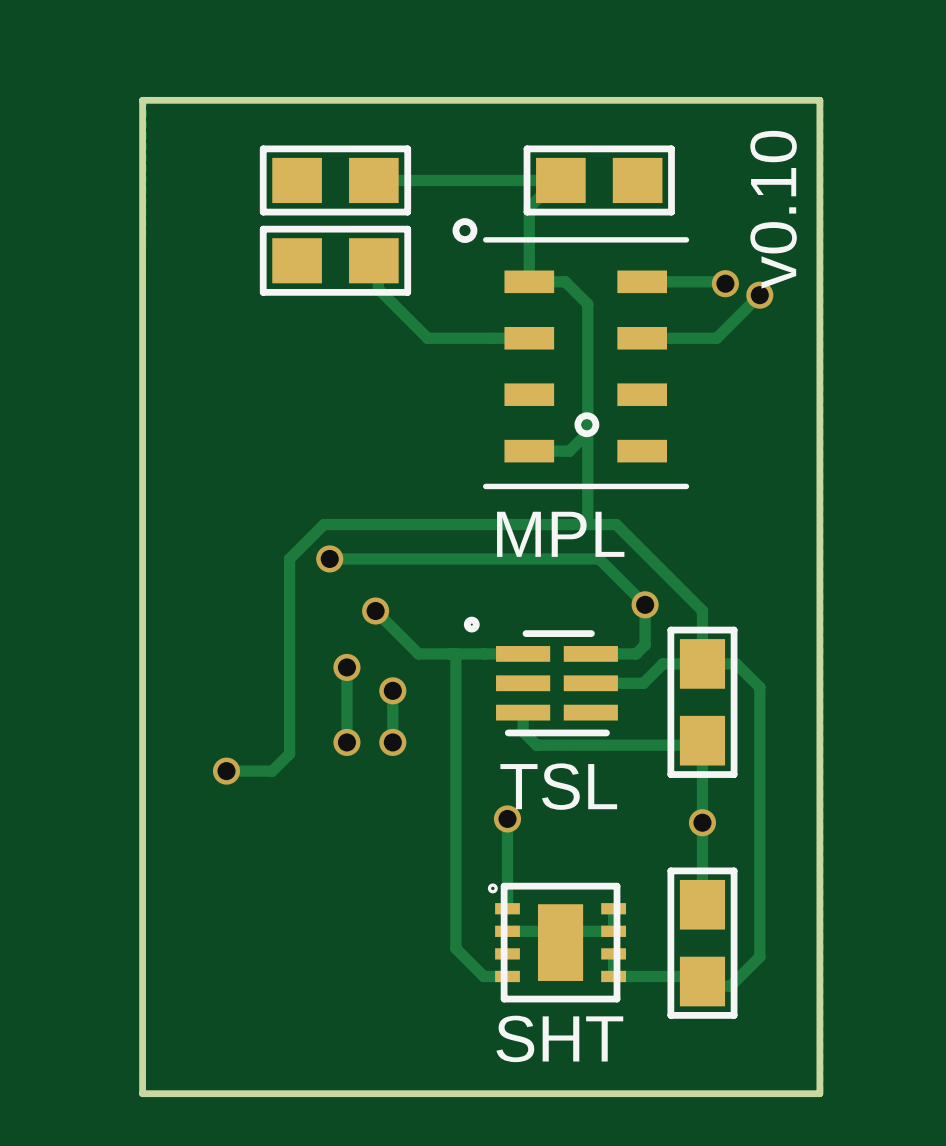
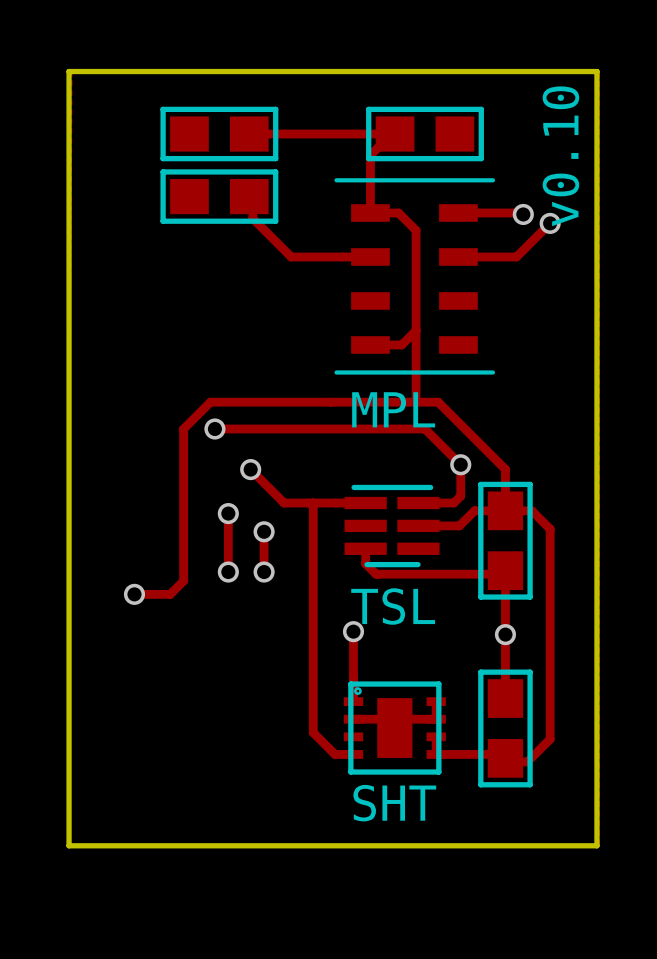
part footprint: [452, 218, 690, 490] -> [334, 178, 496, 375]
part footprint: [463, 616, 618, 737] -> [344, 484, 440, 568]
part footprint: [487, 882, 627, 1003] -> [343, 681, 446, 775]

